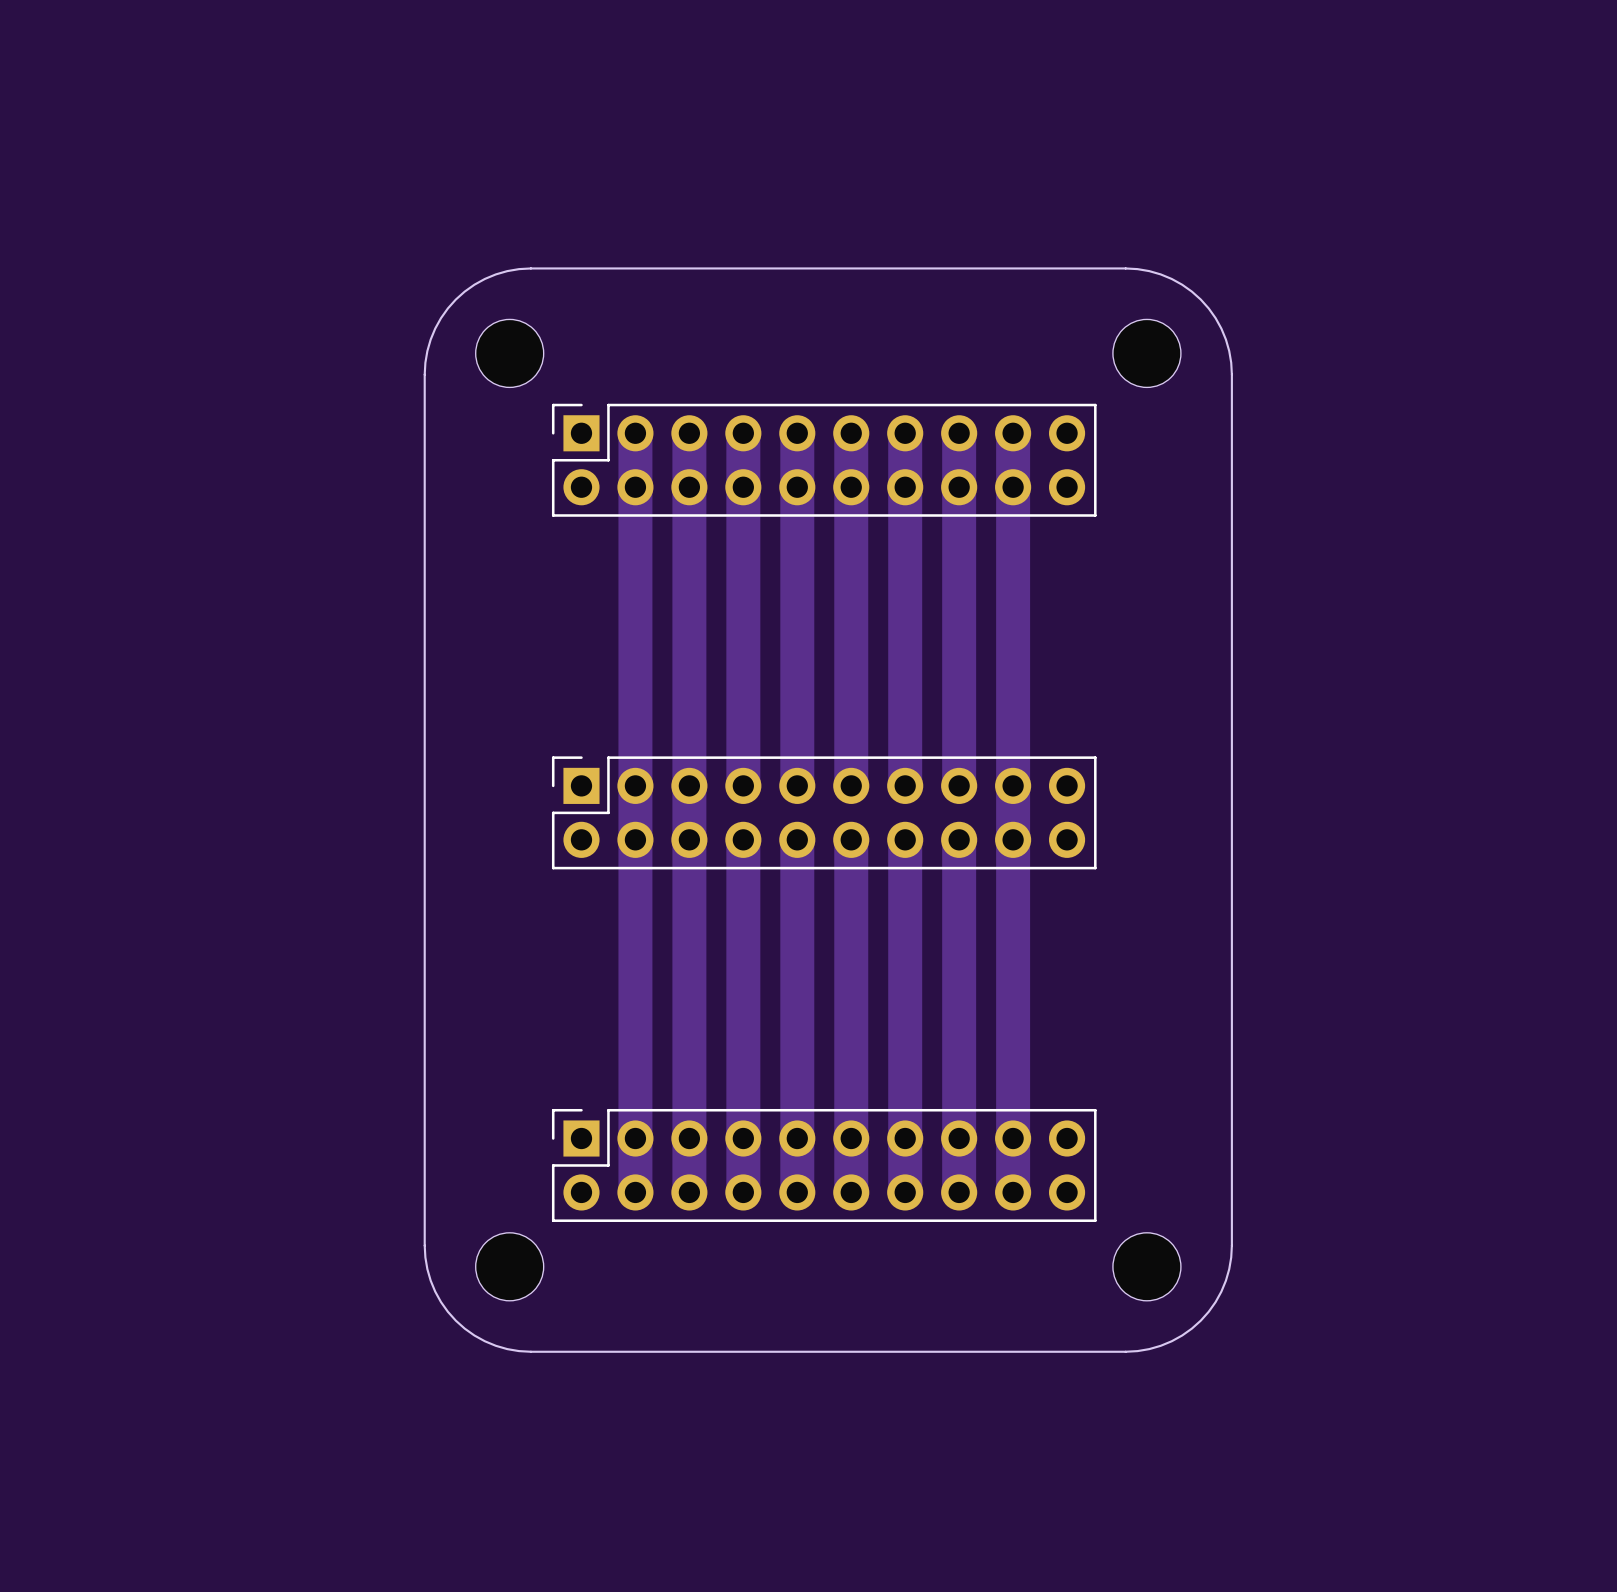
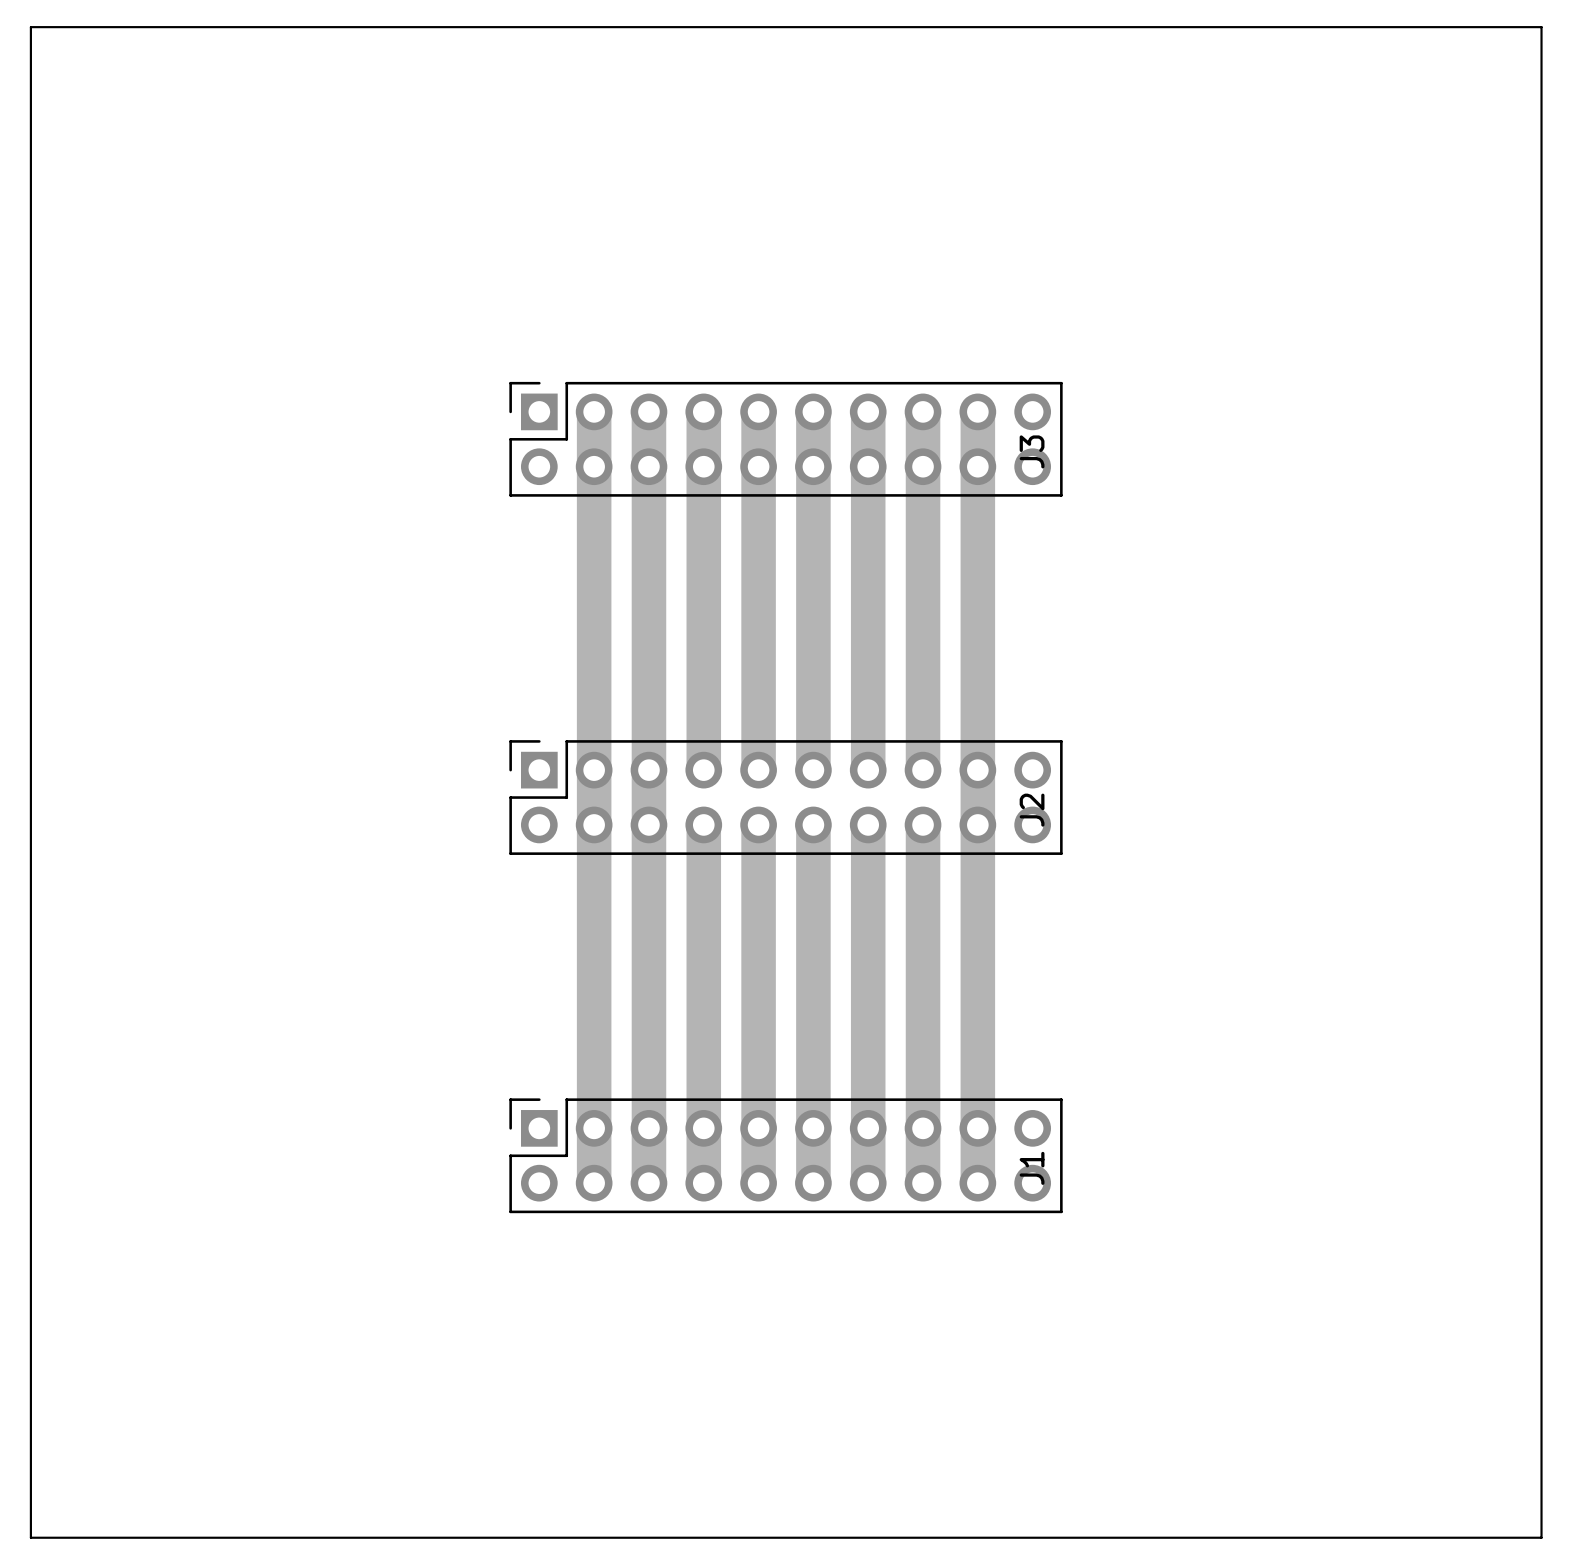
board edge: none -> (30, 27) (30, 1537) (1541, 1537) (1541, 27) (30, 27)
board edge: (530, 268) (1137, 269) (1160, 274) (1182, 284) (1200, 299) (1215, 318) (1225, 339) (1231, 374) (1231, 1245) (1225, 1280) (1215, 1302) (1200, 1320) (1182, 1335) (1160, 1345) (1125, 1351) (530, 1351) (495, 1345) (474, 1335) (455, 1320) (441, 1302) (430, 1280) (424, 1245) (425, 362) (430, 339) (441, 318) (464, 291) (495, 274) (530, 268) -> none
part: (509, 353) -> none
part: (1146, 353) -> none
J3 name: none -> J3 (1032, 451)
J2 name: none -> J2 (1032, 810)
J1 name: none -> J1 (1032, 1168)
part: (509, 1266) -> none
part: (1146, 1266) -> none

